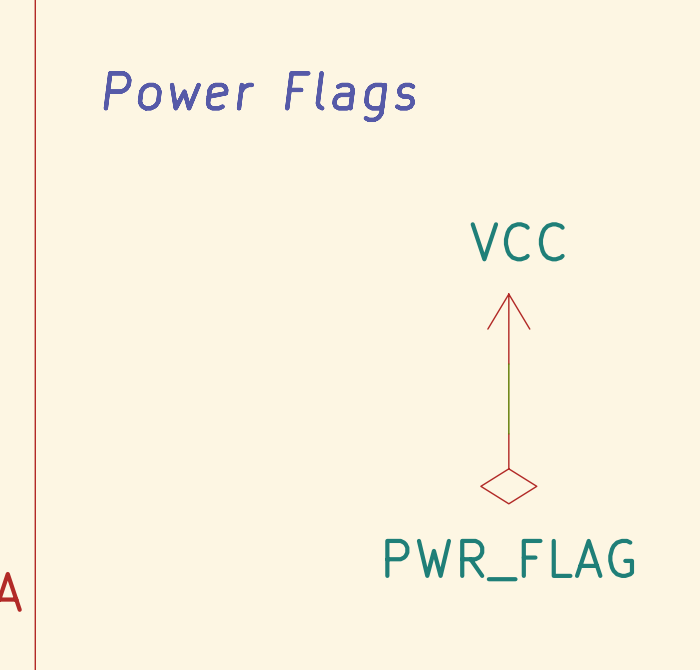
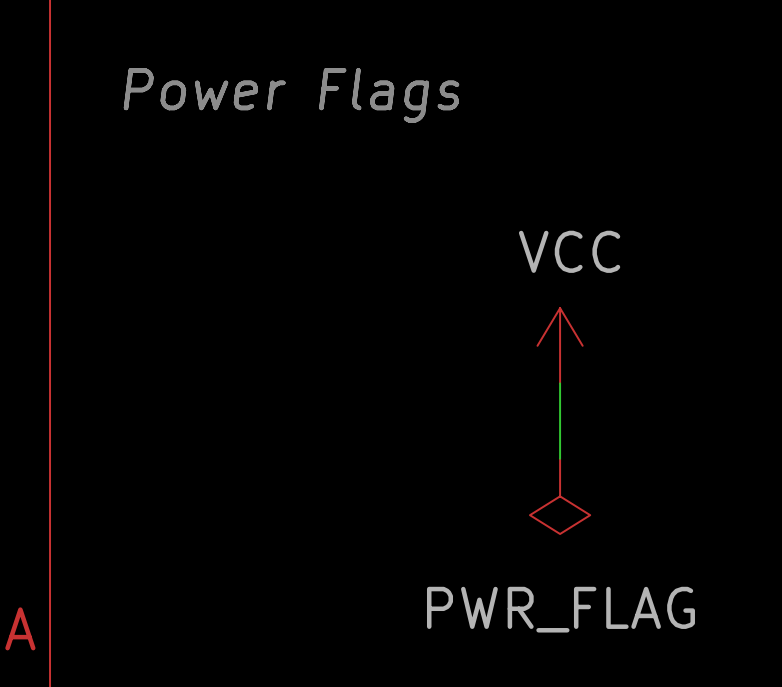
power symbol text position: PWR_FLAG (509, 560) -> PWR_FLAG (560, 609)

